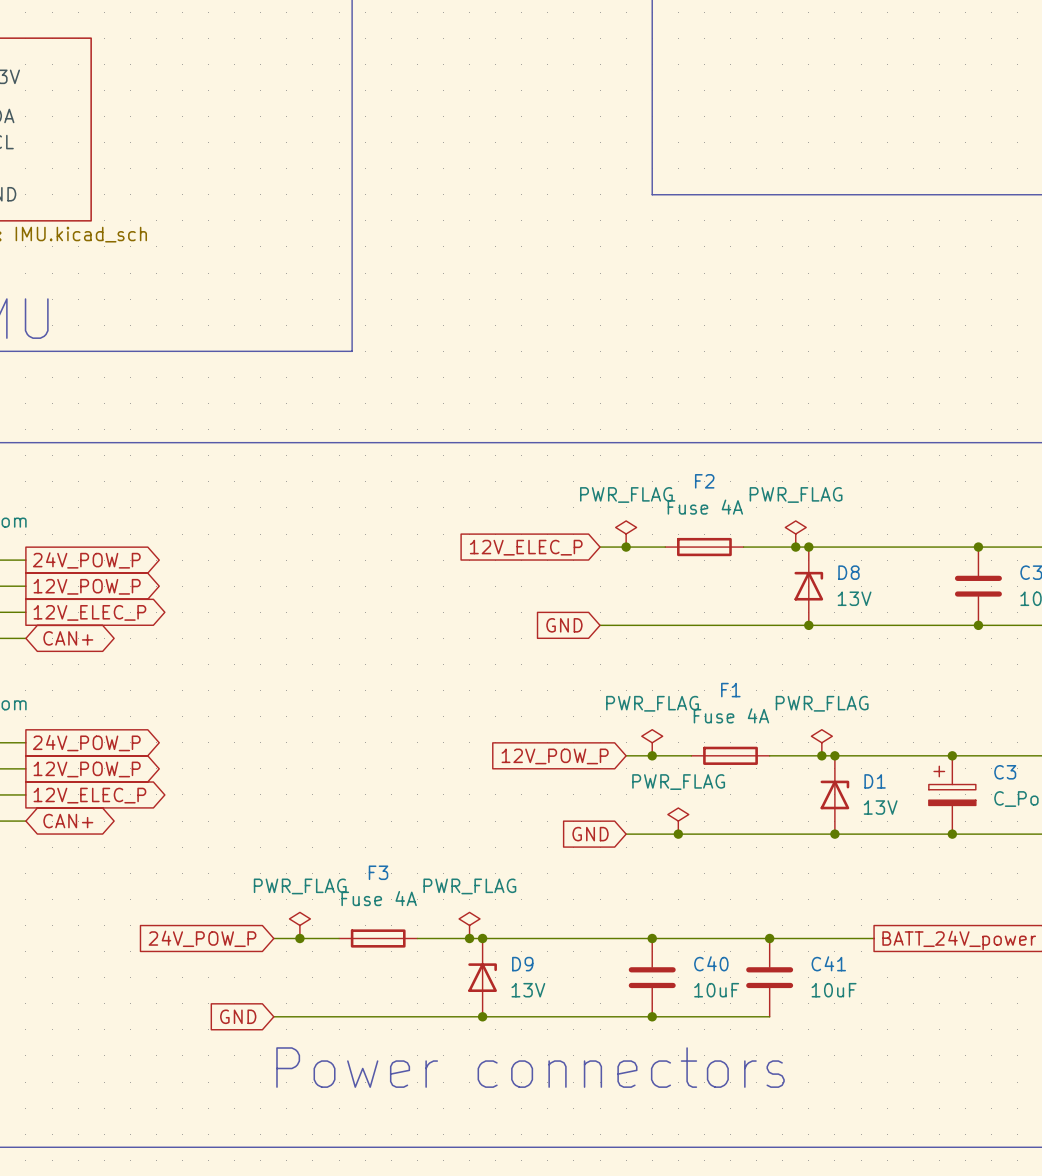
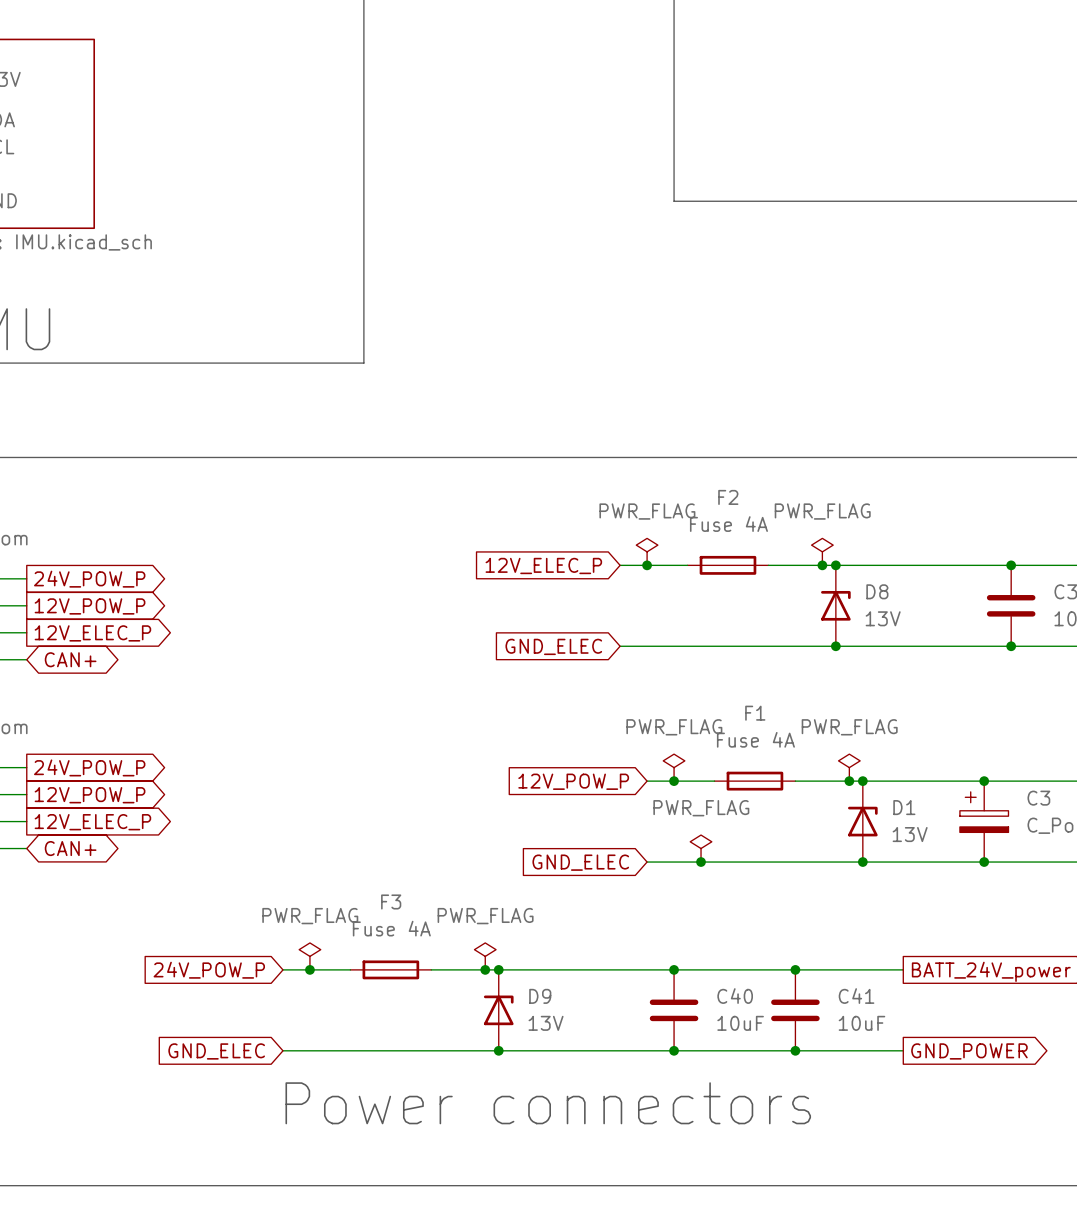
global label: GND (564, 625) -> GND_ELEC (553, 646)
global label: GND (590, 834) -> GND_ELEC (580, 862)
global label: GND (238, 1016) -> GND_ELEC (216, 1051)
wire: none -> (795, 1050) (903, 1050)
junction: none -> (795, 1050)
global label: none -> GND_POWER (969, 1051)

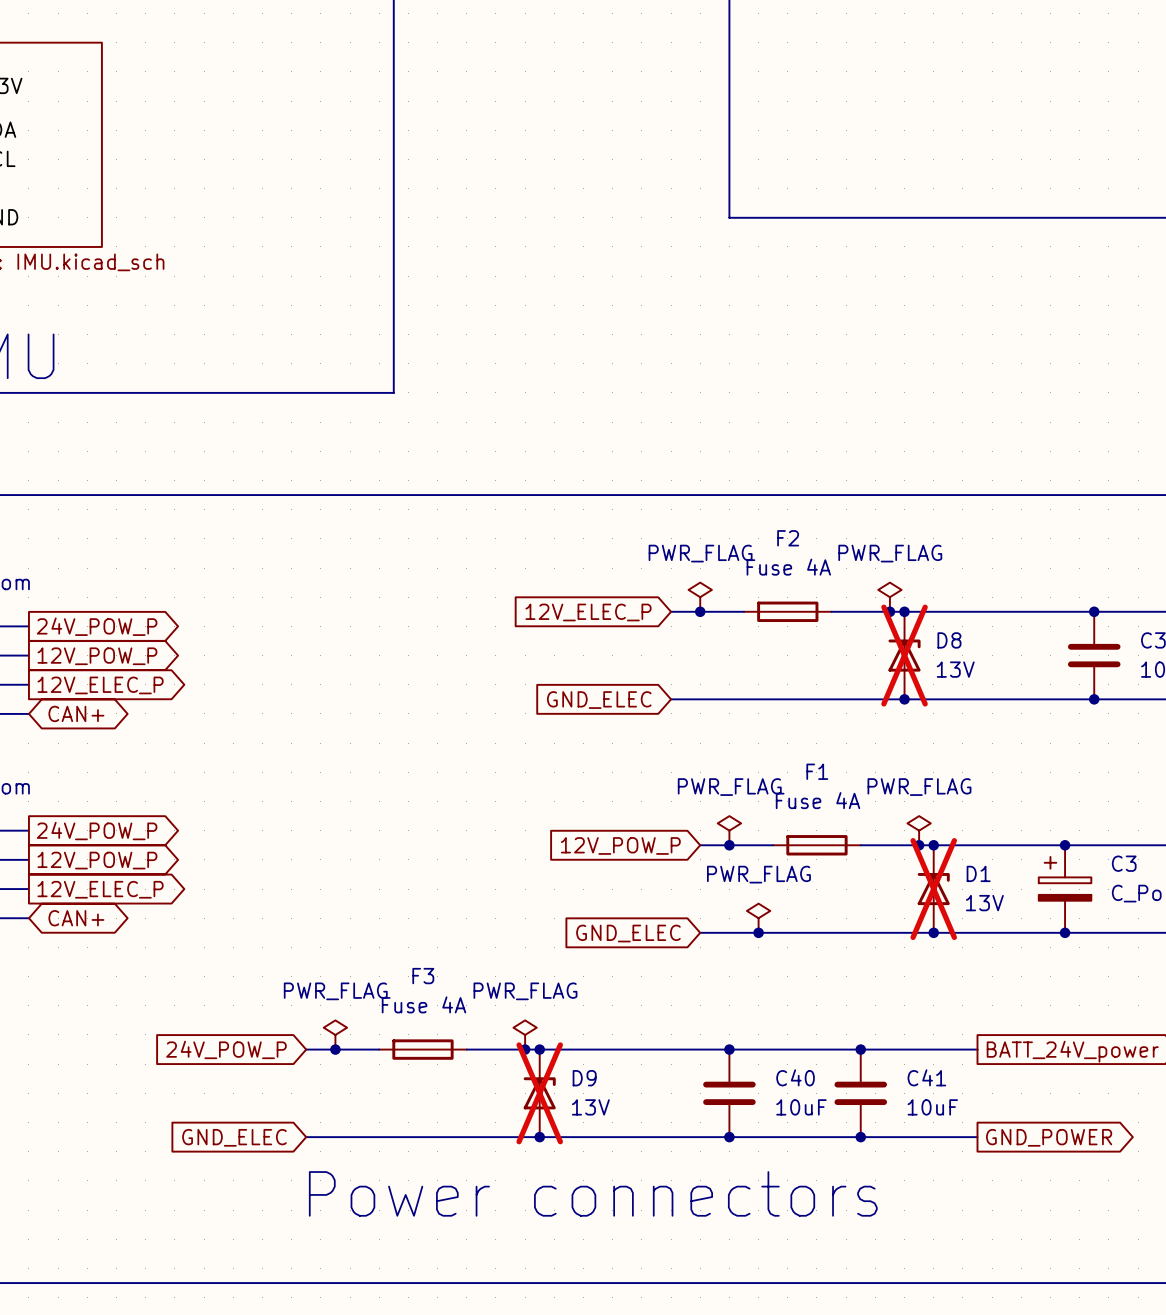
D8 do-not-place cross: none -> (904, 655)
D1 do-not-place cross: none -> (933, 889)
D9 do-not-place cross: none -> (539, 1093)

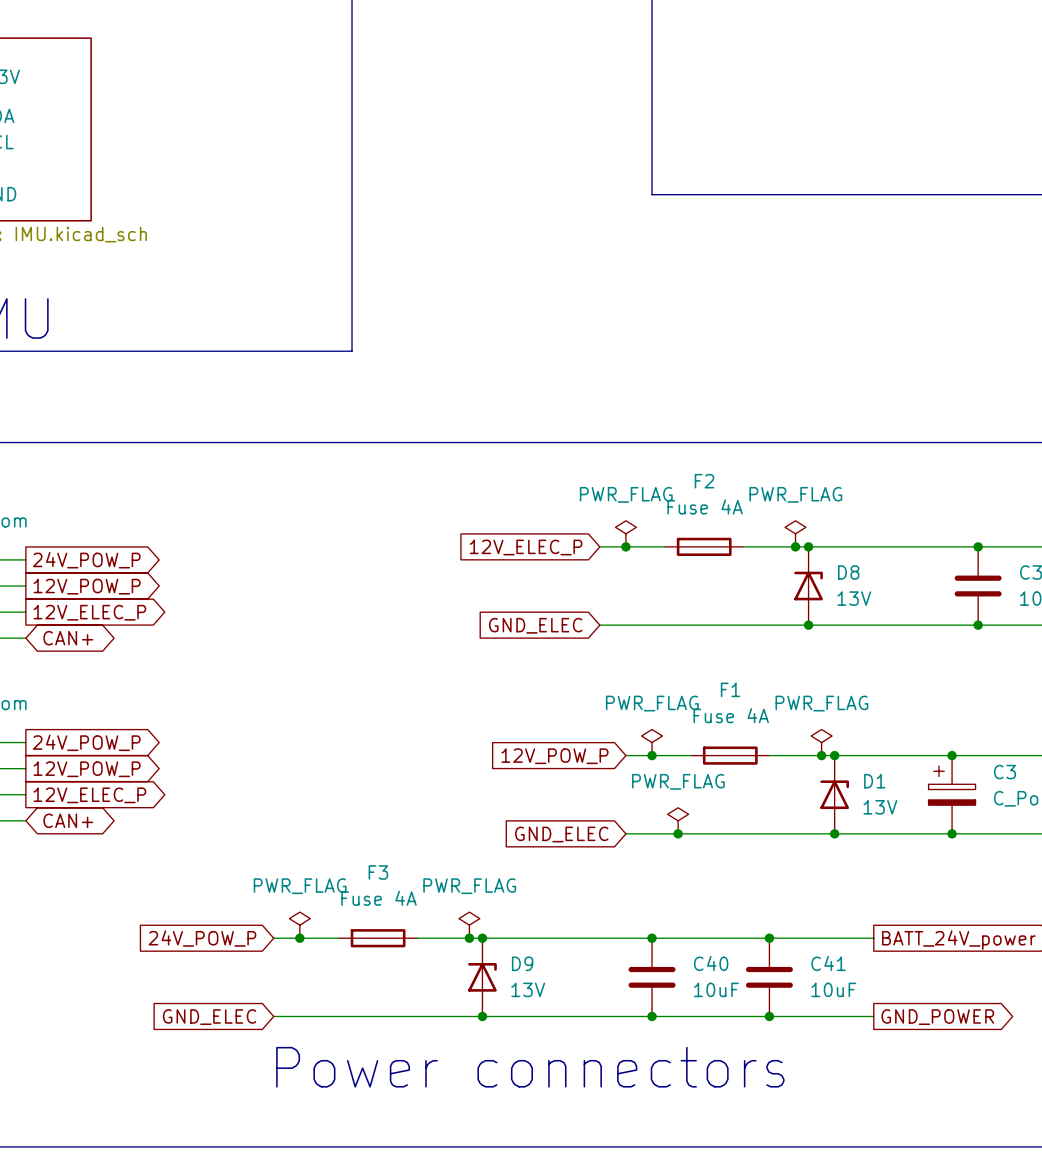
D8 do-not-place cross: (904, 655) -> none
D1 do-not-place cross: (933, 889) -> none
D9 do-not-place cross: (539, 1093) -> none

